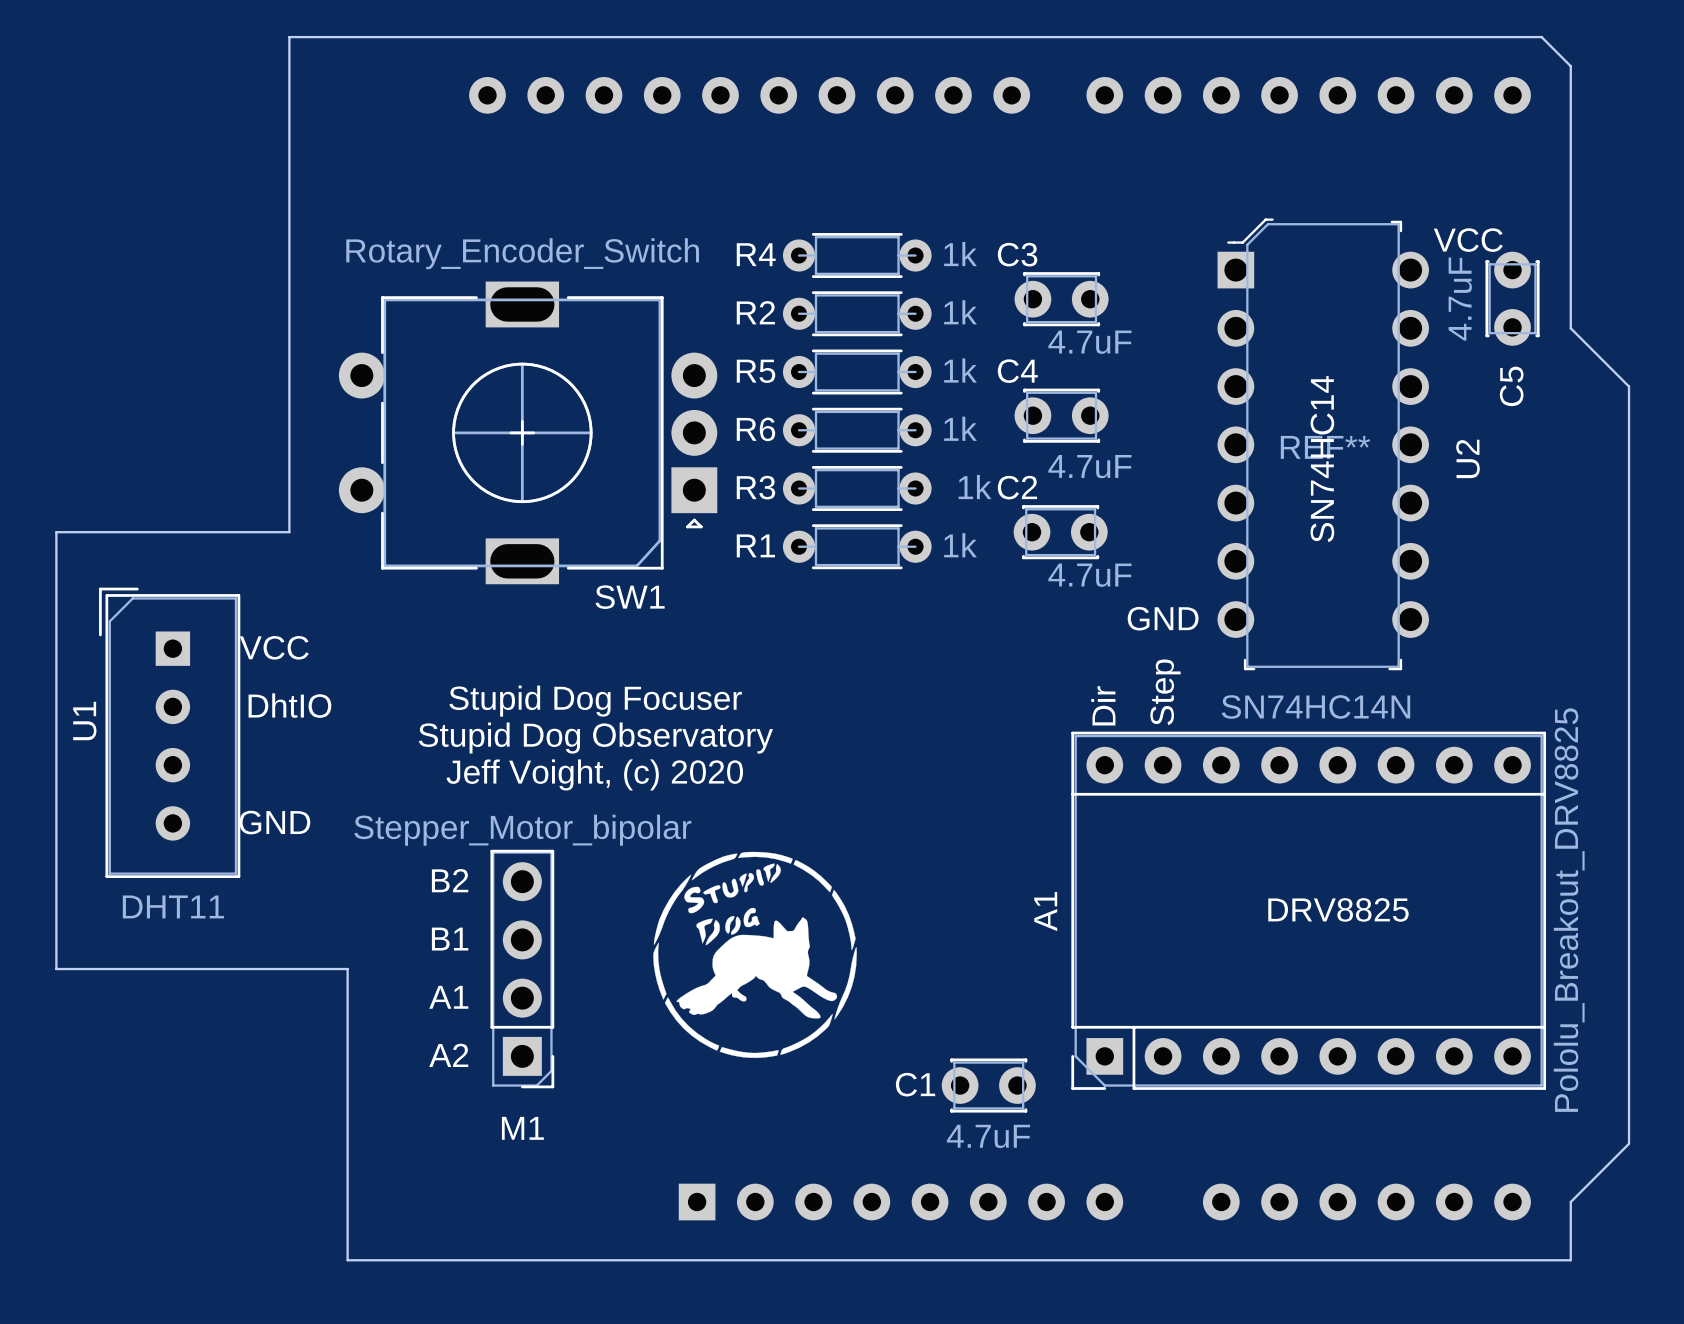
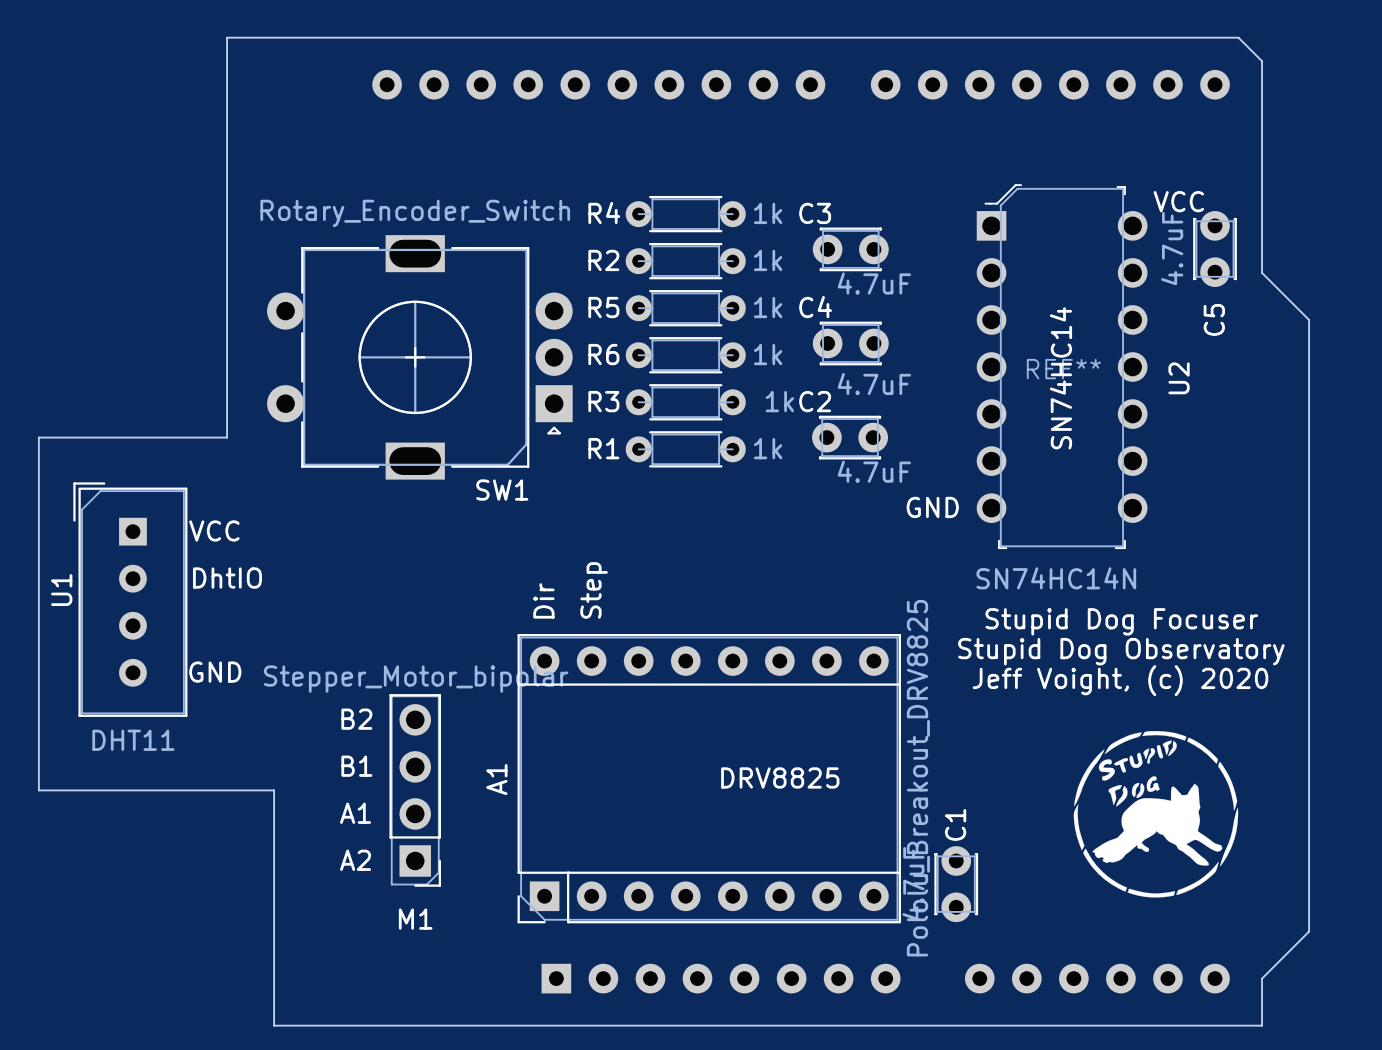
text position: Step (1165, 692) -> Step (594, 590)
text: Stupid Dog Focuser (595, 701) -> none
text position: Dir (1103, 705) -> Dir (543, 600)
text: Stupid Dog Observatory (595, 738) -> none
text: none -> Stupid Dog Focuser (1121, 621)
text: Jeff Voight, (c) 2020 (594, 774) -> none
text: none -> Stupid Dog Observatory (1121, 651)
text: none -> Jeff Voight, (c) 2020 (1120, 680)
drawing: [653, 851, 857, 1058] -> none
drawing: none -> [1073, 731, 1239, 898]
text position: DRV8825 (1338, 909) -> DRV8825 (780, 777)
A1 position: (1308, 910) -> (709, 778)
C1 rotation: 0° (988, 1085) -> 90° clockwise (956, 884)
C1 position: (988, 1085) -> (956, 884)

